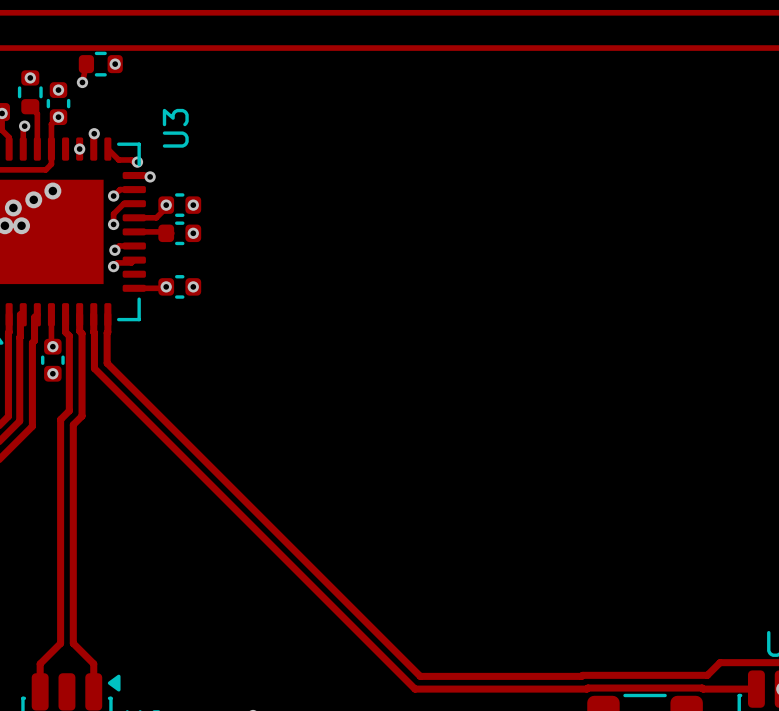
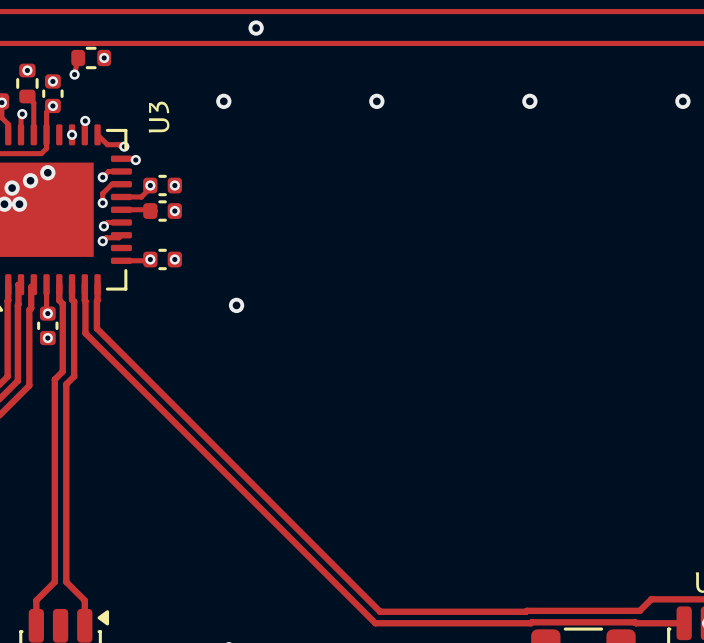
via: none -> (256, 28)
via: none -> (223, 101)
via: none -> (376, 101)
via: none -> (529, 101)
via: none -> (682, 101)
via: none -> (236, 305)

